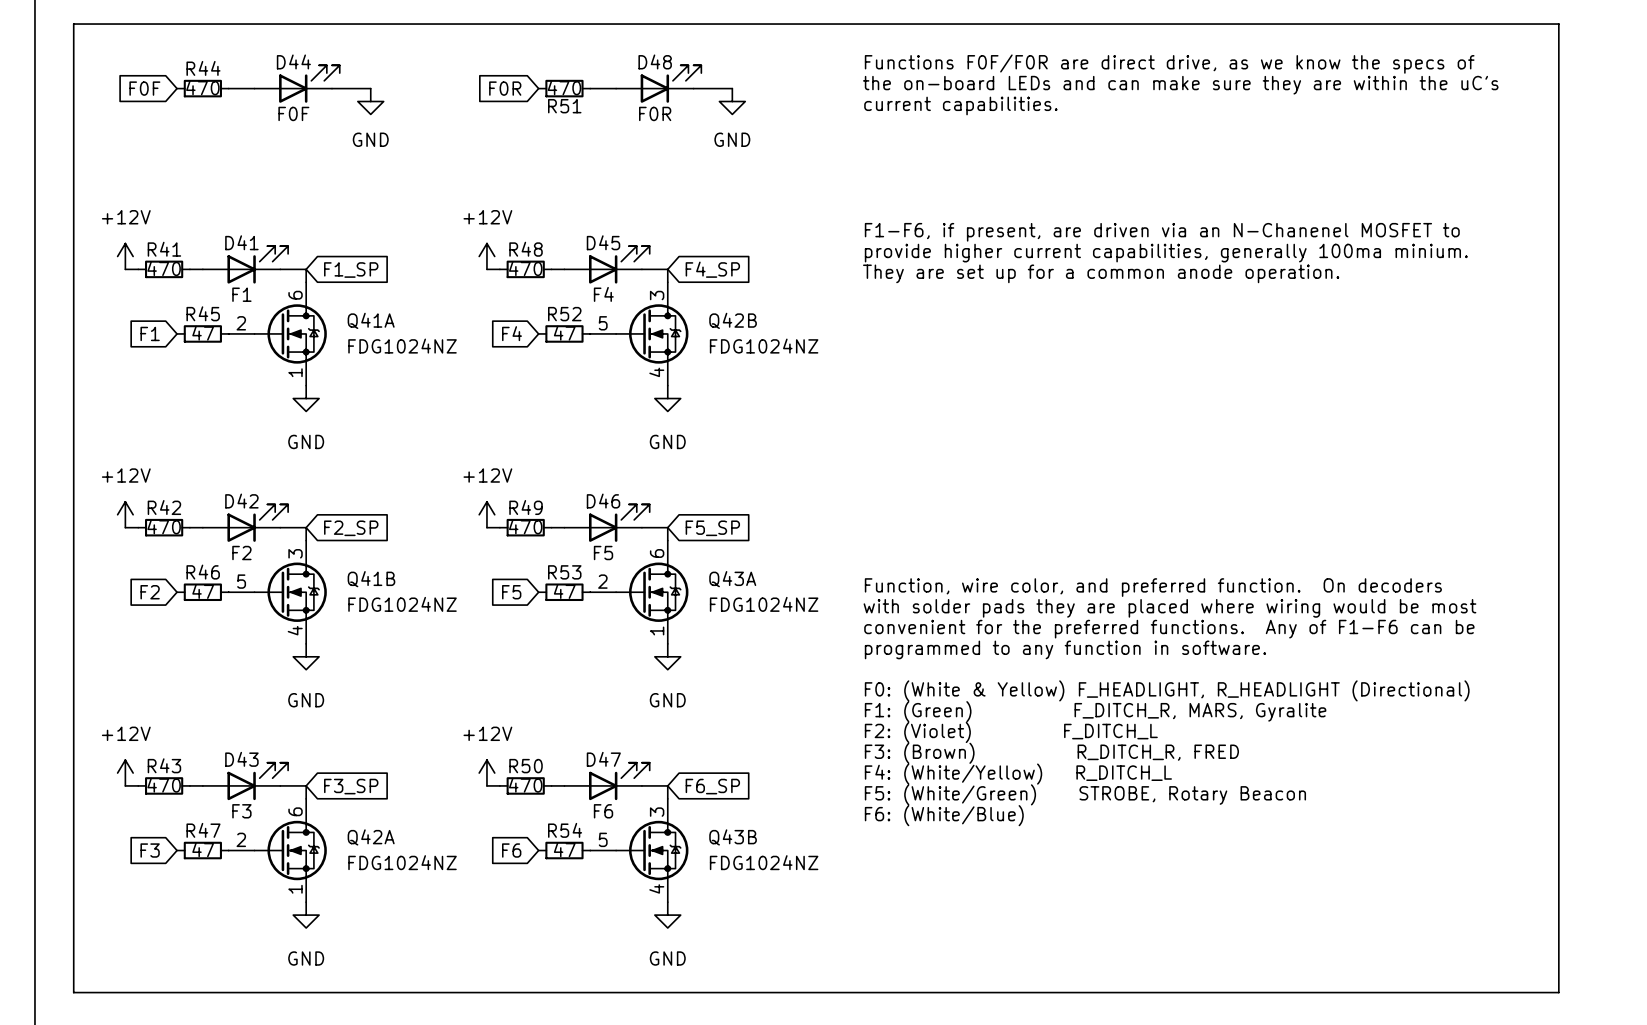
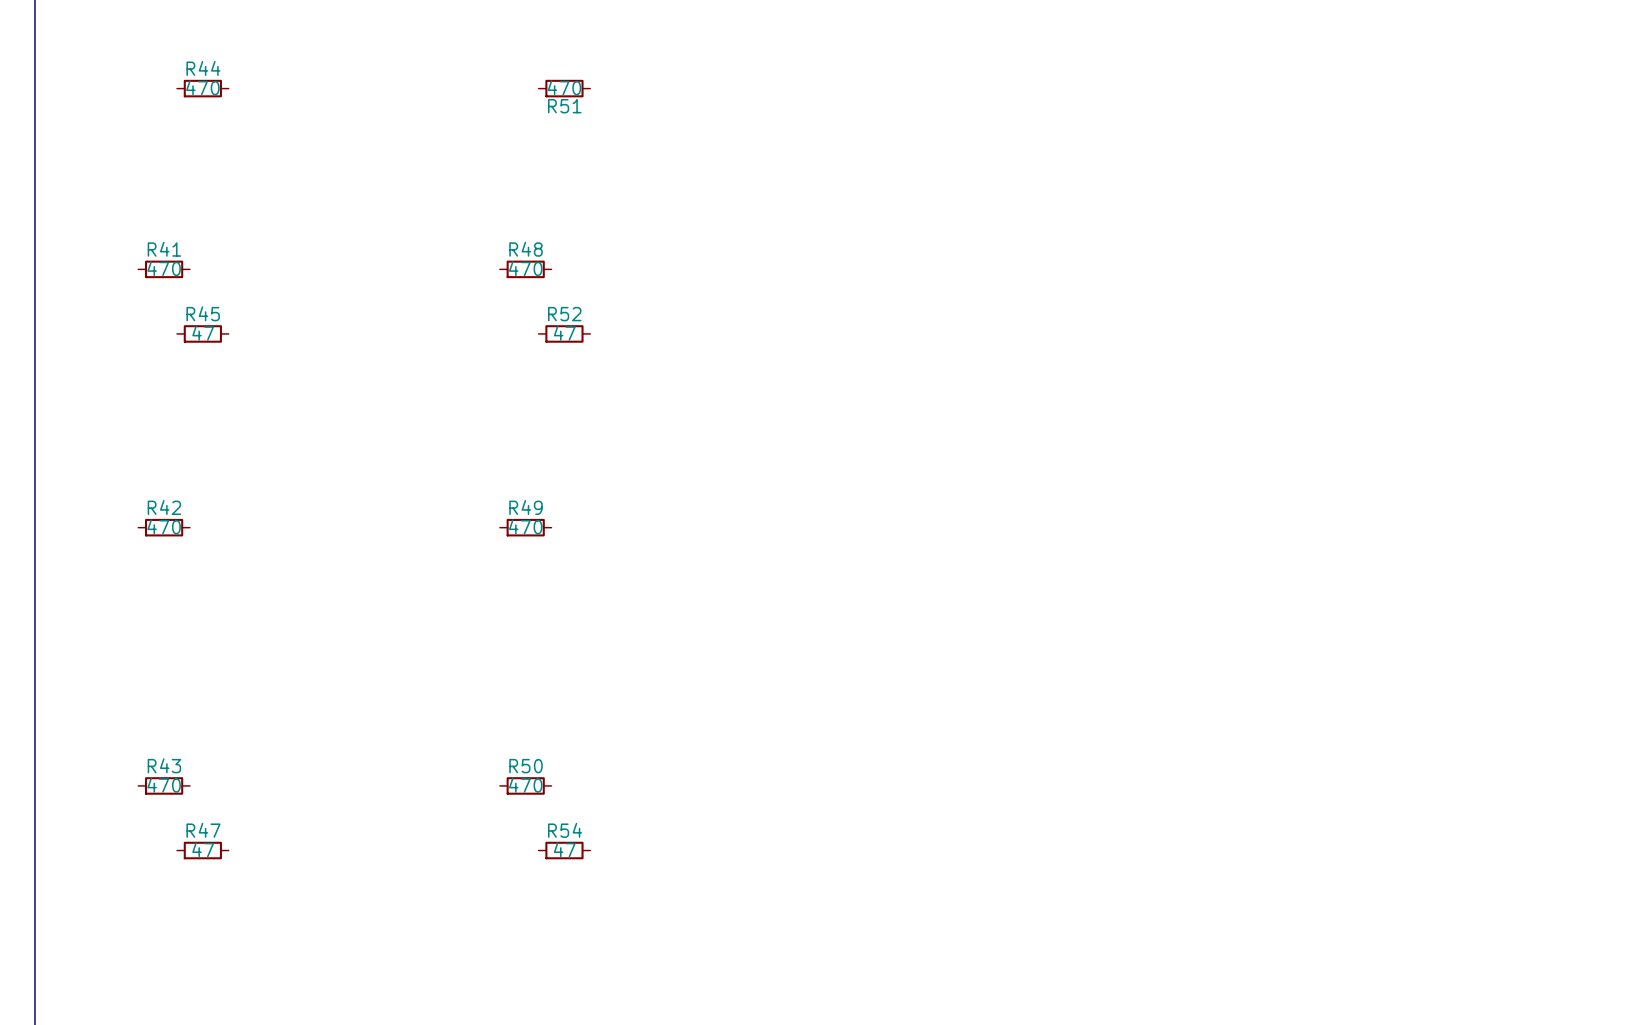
line: (73, 24) (73, 992) (1558, 992) (1558, 24) (73, 24) -> none
text: Functions F0F/F0R are direct drive, as we know the specs of (1169, 64) -> none
D44: F0F (297, 84) -> none
D48: F0R (658, 84) -> none
text: the on-board LEDs and can make sure they are within the uC's (1180, 85) -> none
global label: F0F (144, 88) -> none
wire: (228, 88) (254, 88) -> none
wire: (332, 88) (370, 88) -> none
global label: F0R (505, 88) -> none
wire: (590, 88) (616, 88) -> none
wire: (693, 88) (732, 88) -> none
power symbol: GND (370, 101) -> none
power symbol: GND (732, 101) -> none
text: current capabilities. (960, 105) -> none
text: F1-F6, if present, are driven via an N-Chanenel MOSFET to (1162, 232) -> none
text: provide higher current capabilities, generally 100ma minium. (1166, 253) -> none
power symbol: +12V (125, 256) -> none
power symbol: +12V (486, 256) -> none
D41: F1 (245, 264) -> none
D45: F4 (607, 264) -> none
wire: (125, 269) (138, 269) -> none
wire: (189, 269) (202, 269) -> none
wire: (280, 269) (306, 269) (306, 282) -> none
wire: (486, 269) (499, 269) -> none
wire: (551, 269) (564, 269) -> none
wire: (641, 269) (667, 269) (667, 282) -> none
global label: F4_SP (712, 269) -> none
global label: F1_SP (351, 270) -> none
text: They are set up for a common anode operation. (1101, 273) -> none
global label: F1 (150, 333) -> none
Q41A: FDG1024NZ (277, 333) -> none
global label: F4 (512, 333) -> none
Q42B: FDG1024NZ (639, 333) -> none
power symbol: GND (306, 398) -> none
power symbol: GND (667, 398) -> none
power symbol: +12V (125, 514) -> none
power symbol: +12V (486, 514) -> none
D42: F2 (245, 523) -> none
D46: F5 (607, 523) -> none
wire: (125, 527) (138, 527) -> none
wire: (189, 527) (202, 527) -> none
wire: (280, 527) (306, 527) (306, 540) -> none
wire: (486, 527) (499, 527) -> none
wire: (551, 527) (564, 527) -> none
wire: (641, 527) (667, 527) (667, 540) -> none
global label: F2_SP (351, 528) -> none
global label: F5_SP (712, 528) -> none
text: Function, wire color, and preferred function. On decoders (1153, 587) -> none
global label: F2 (150, 592) -> none
R46: 47 (202, 592) -> none
Q41B: FDG1024NZ (277, 592) -> none
global label: F5 (511, 592) -> none
R53: 47 (564, 592) -> none
Q43A: FDG1024NZ (639, 592) -> none
text: with solder pads they are placed where wiring would be most (1169, 608) -> none
text: convenient for the preferred functions. Any of F1-F6 can be (1169, 629) -> none
text: programmed to any function in software. (1065, 649) -> none
power symbol: GND (306, 656) -> none
power symbol: GND (667, 656) -> none
text: F0: (White & Yellow) F_HEADLIGHT, R_HEADLIGHT (Directional) (1167, 690) -> none
text: F1: (Green) F_DITCH_R, MARS, Gyralite (1095, 711) -> none
text: F2: (Violet) F_DITCH_L (1011, 732) -> none
text: F3: (Brown) R_DITCH_R, FRED (1051, 753) -> none
power symbol: +12V (125, 773) -> none
power symbol: +12V (486, 773) -> none
text: F4: (White/Yellow) R_DITCH_L (1018, 774) -> none
D43: F3 (245, 781) -> none
D47: F6 (607, 781) -> none
wire: (125, 785) (138, 785) -> none
wire: (189, 785) (202, 785) -> none
wire: (280, 785) (306, 785) (306, 798) -> none
wire: (486, 785) (499, 785) -> none
wire: (551, 785) (564, 785) -> none
wire: (641, 785) (667, 785) (667, 798) -> none
global label: F3_SP (351, 786) -> none
global label: F6_SP (712, 786) -> none
text: F5: (White/Green) STROBE, Rotary Beacon (1085, 794) -> none
text: F6: (White/Blue) (944, 815) -> none
global label: F3 (150, 850) -> none
Q42A: FDG1024NZ (277, 850) -> none
global label: F6 (511, 850) -> none
Q43B: FDG1024NZ (639, 850) -> none
power symbol: GND (306, 915) -> none
power symbol: GND (667, 915) -> none

